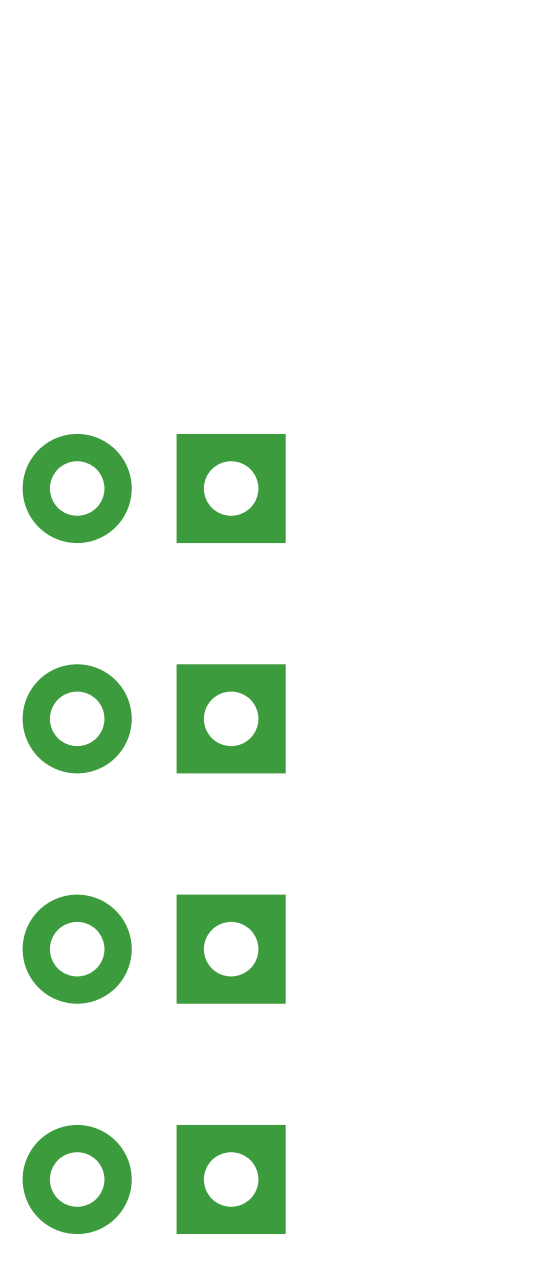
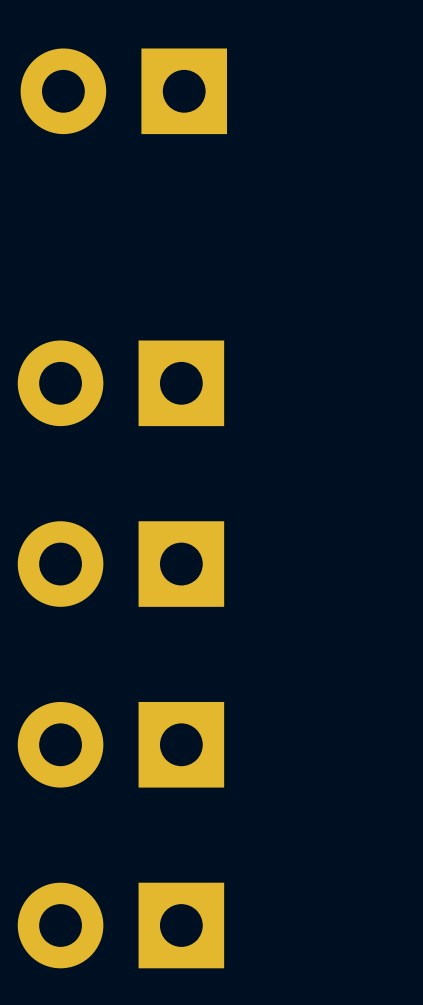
part: none -> (123, 91)

